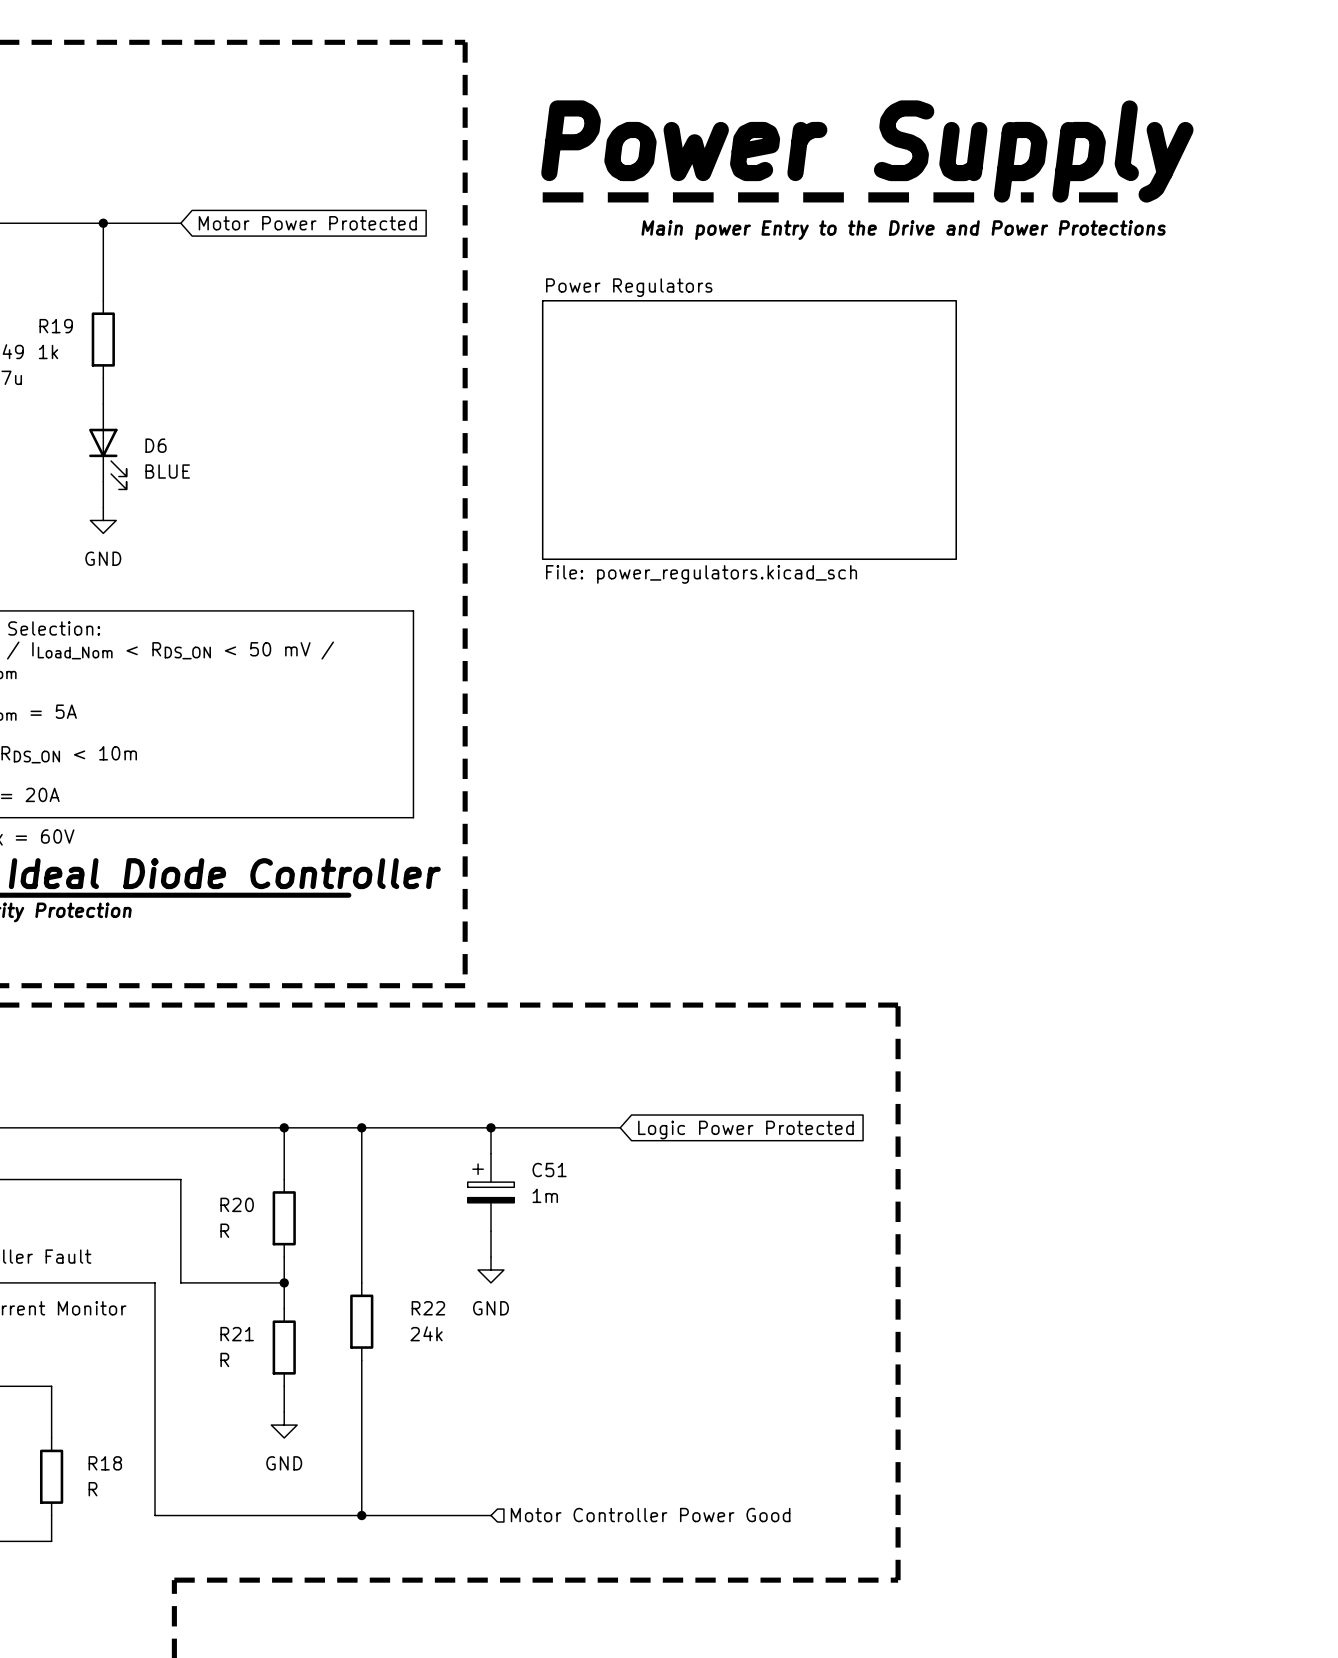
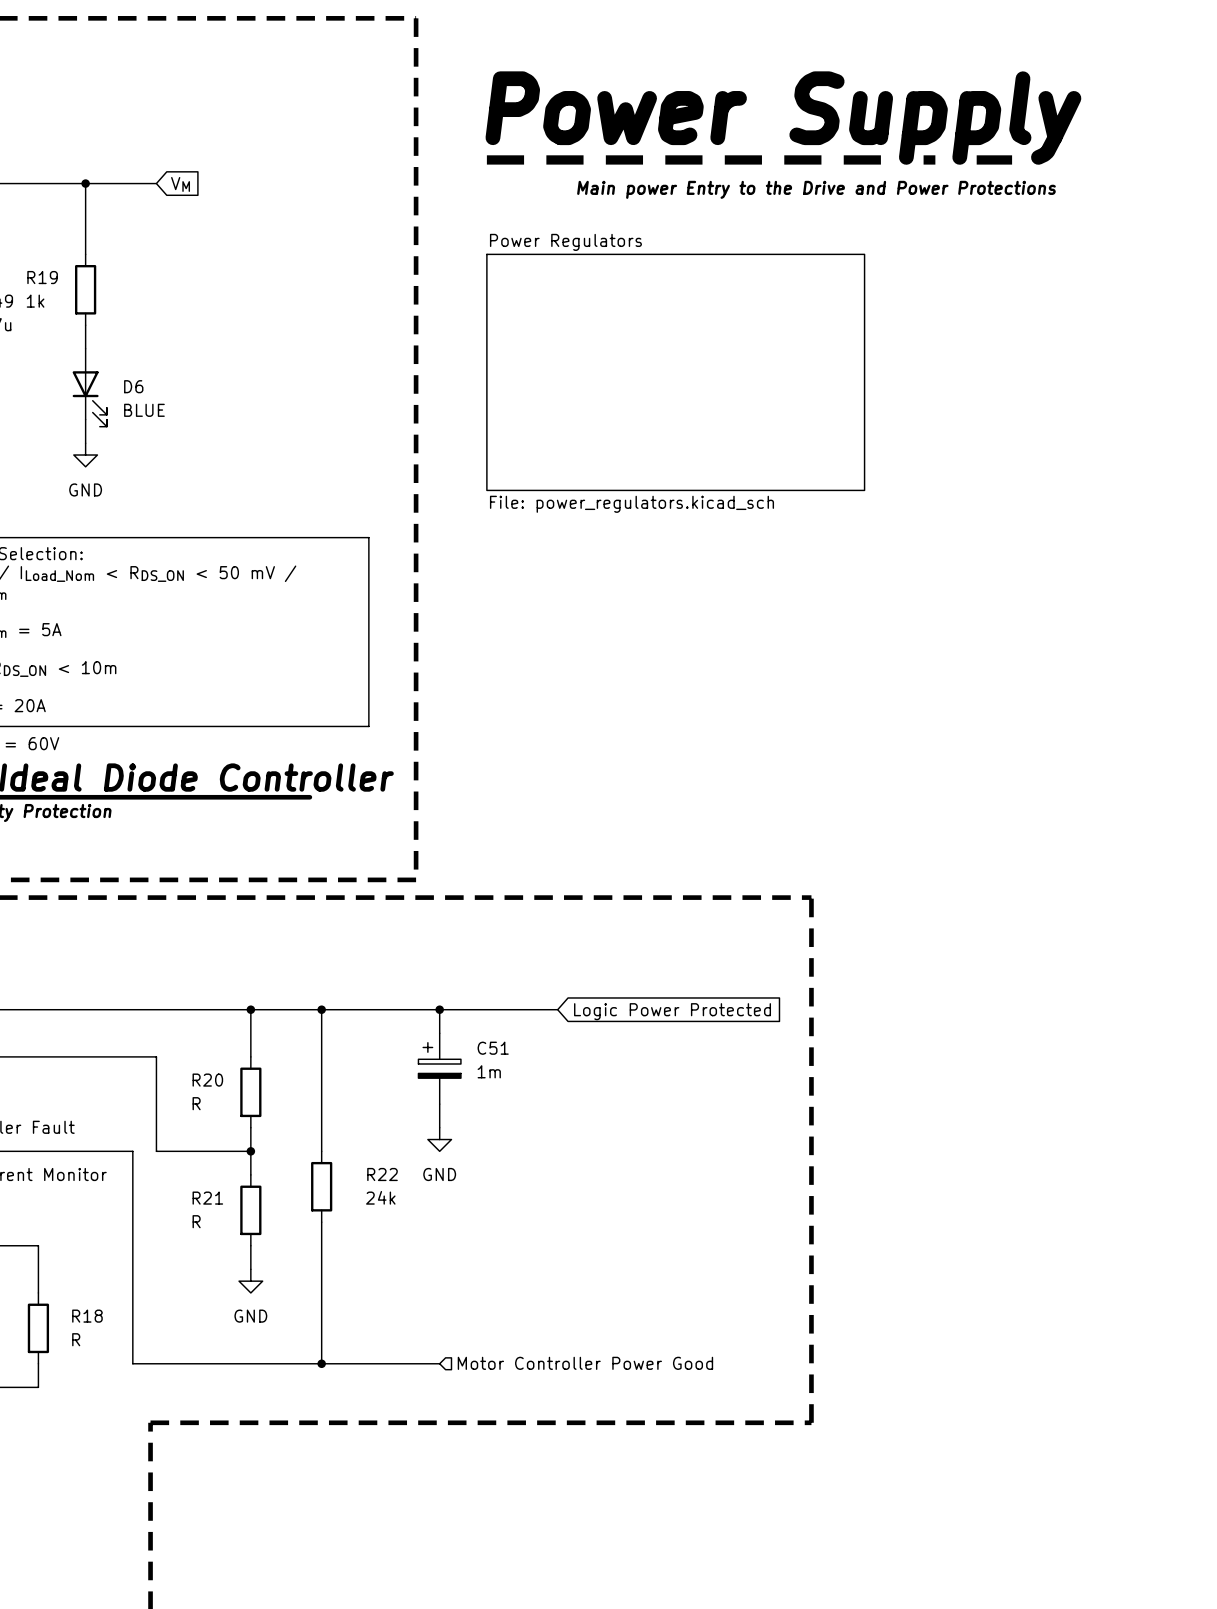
global label: Motor Power Protected (307, 223) -> VM (180, 184)

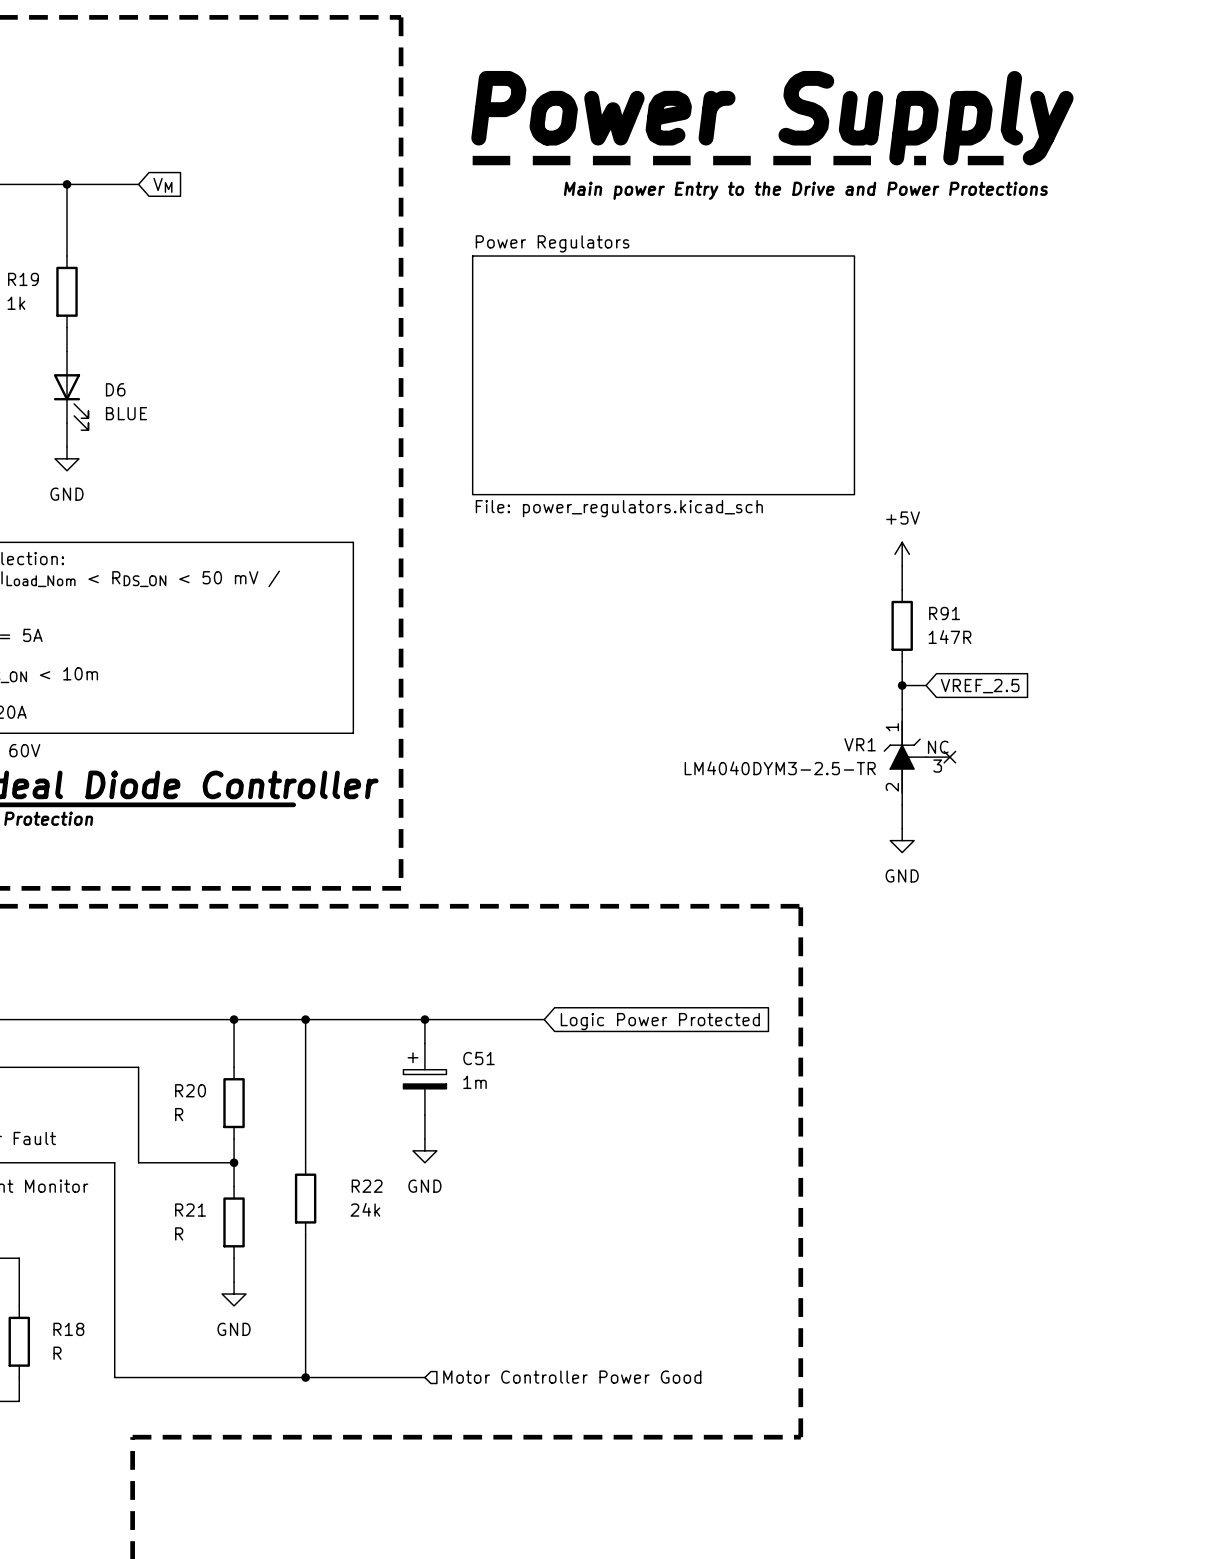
power symbol: none -> +5V (902, 554)
wire: none -> (902, 566) (902, 590)
R91: none -> 147R (902, 625)
wire: none -> (902, 661) (902, 709)
wire: none -> (902, 685) (926, 685)
junction: none -> (902, 685)
global label: none -> VREF_2.5 (980, 686)
VR1: none -> LM4040DYM3-2.5-TR (917, 757)
no-connect mark: none -> (949, 757)
wire: none -> (902, 804) (902, 828)
power symbol: none -> GND (902, 840)

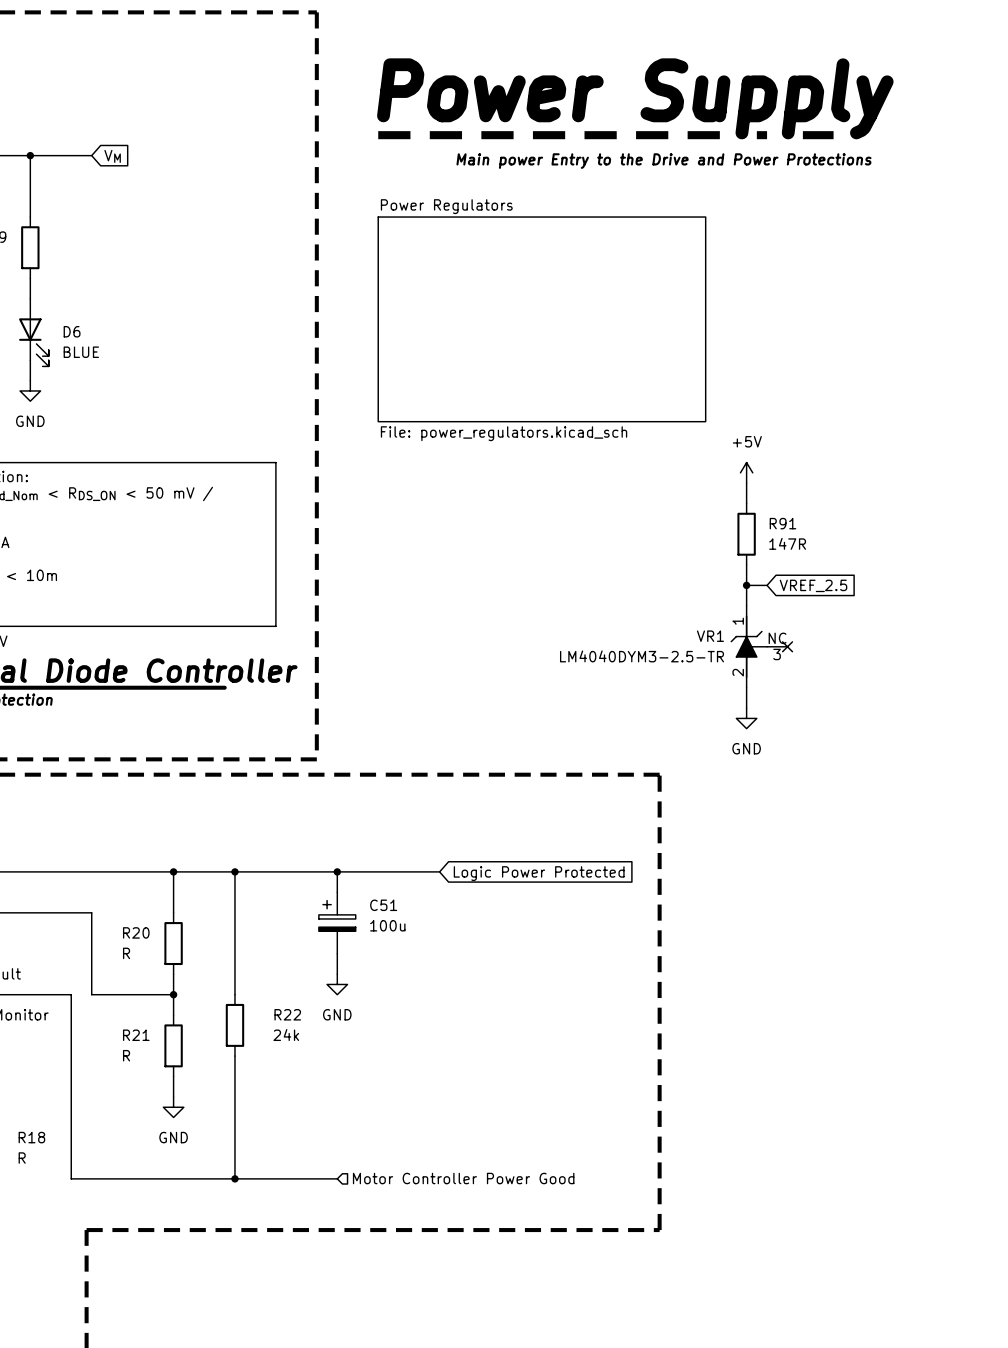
C51 value: 1m (475, 1082) -> 100u (387, 925)

